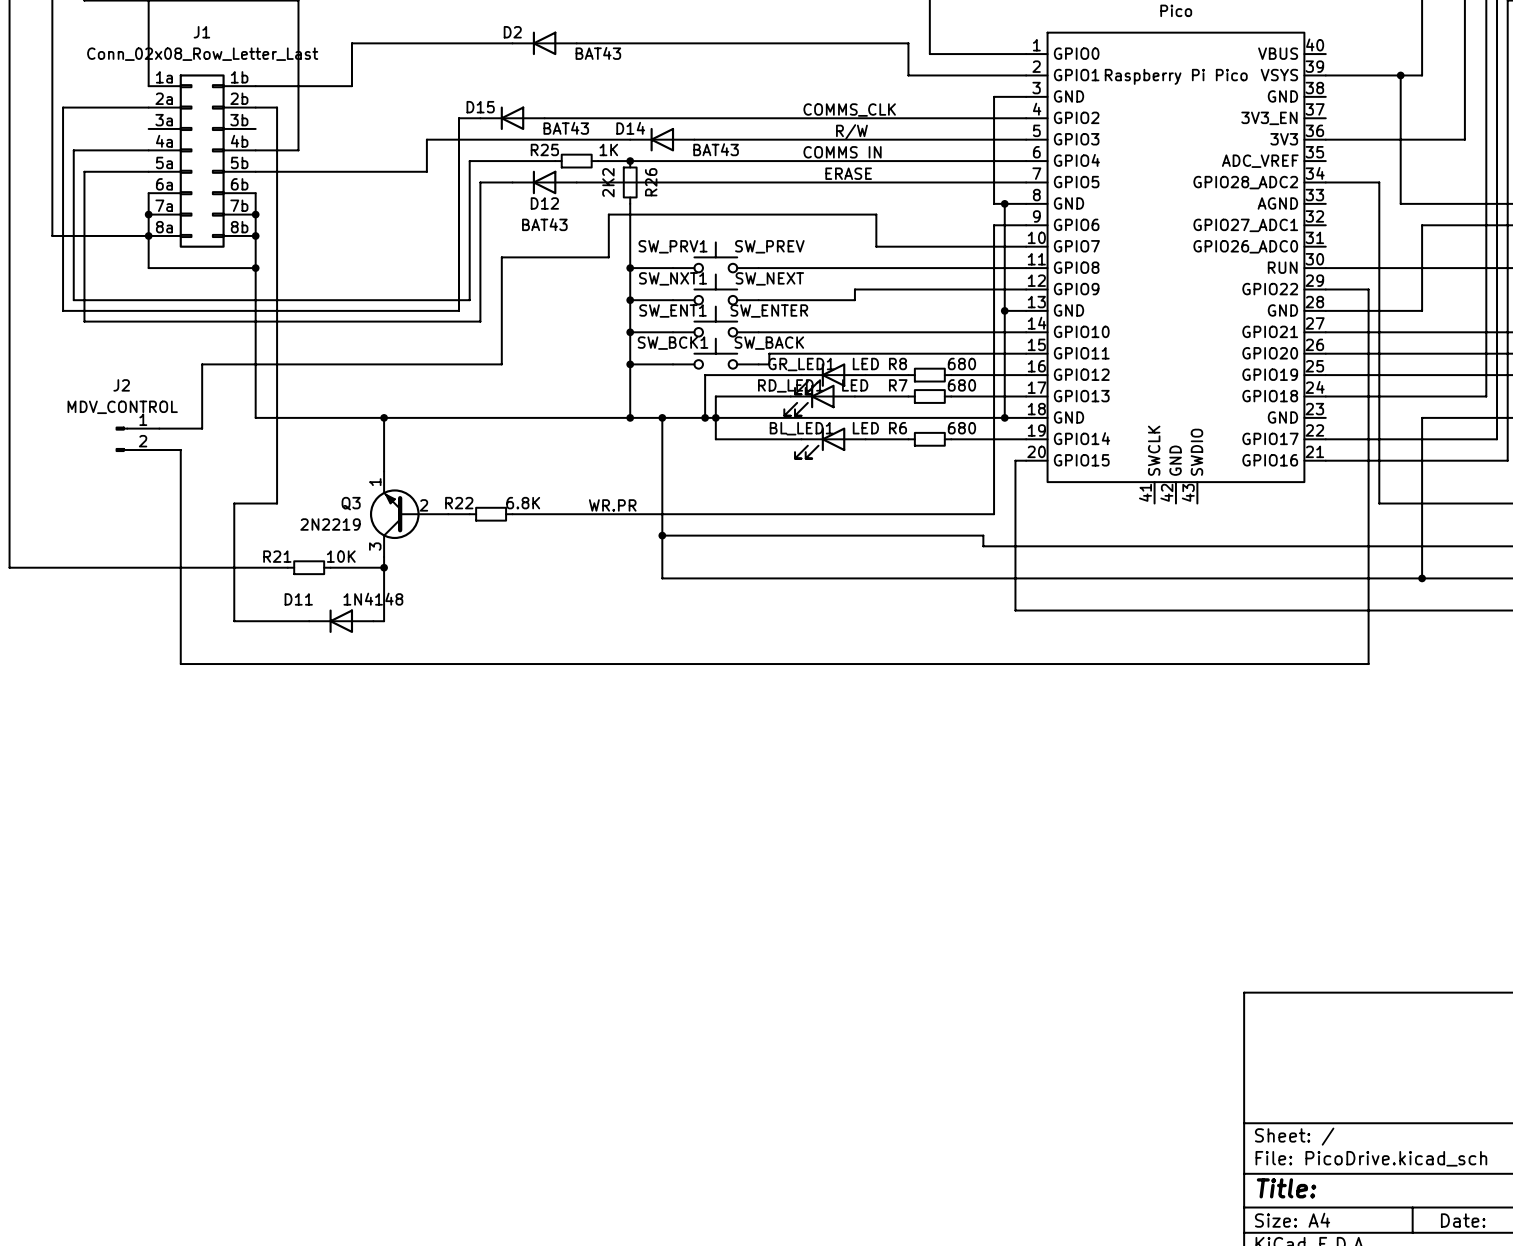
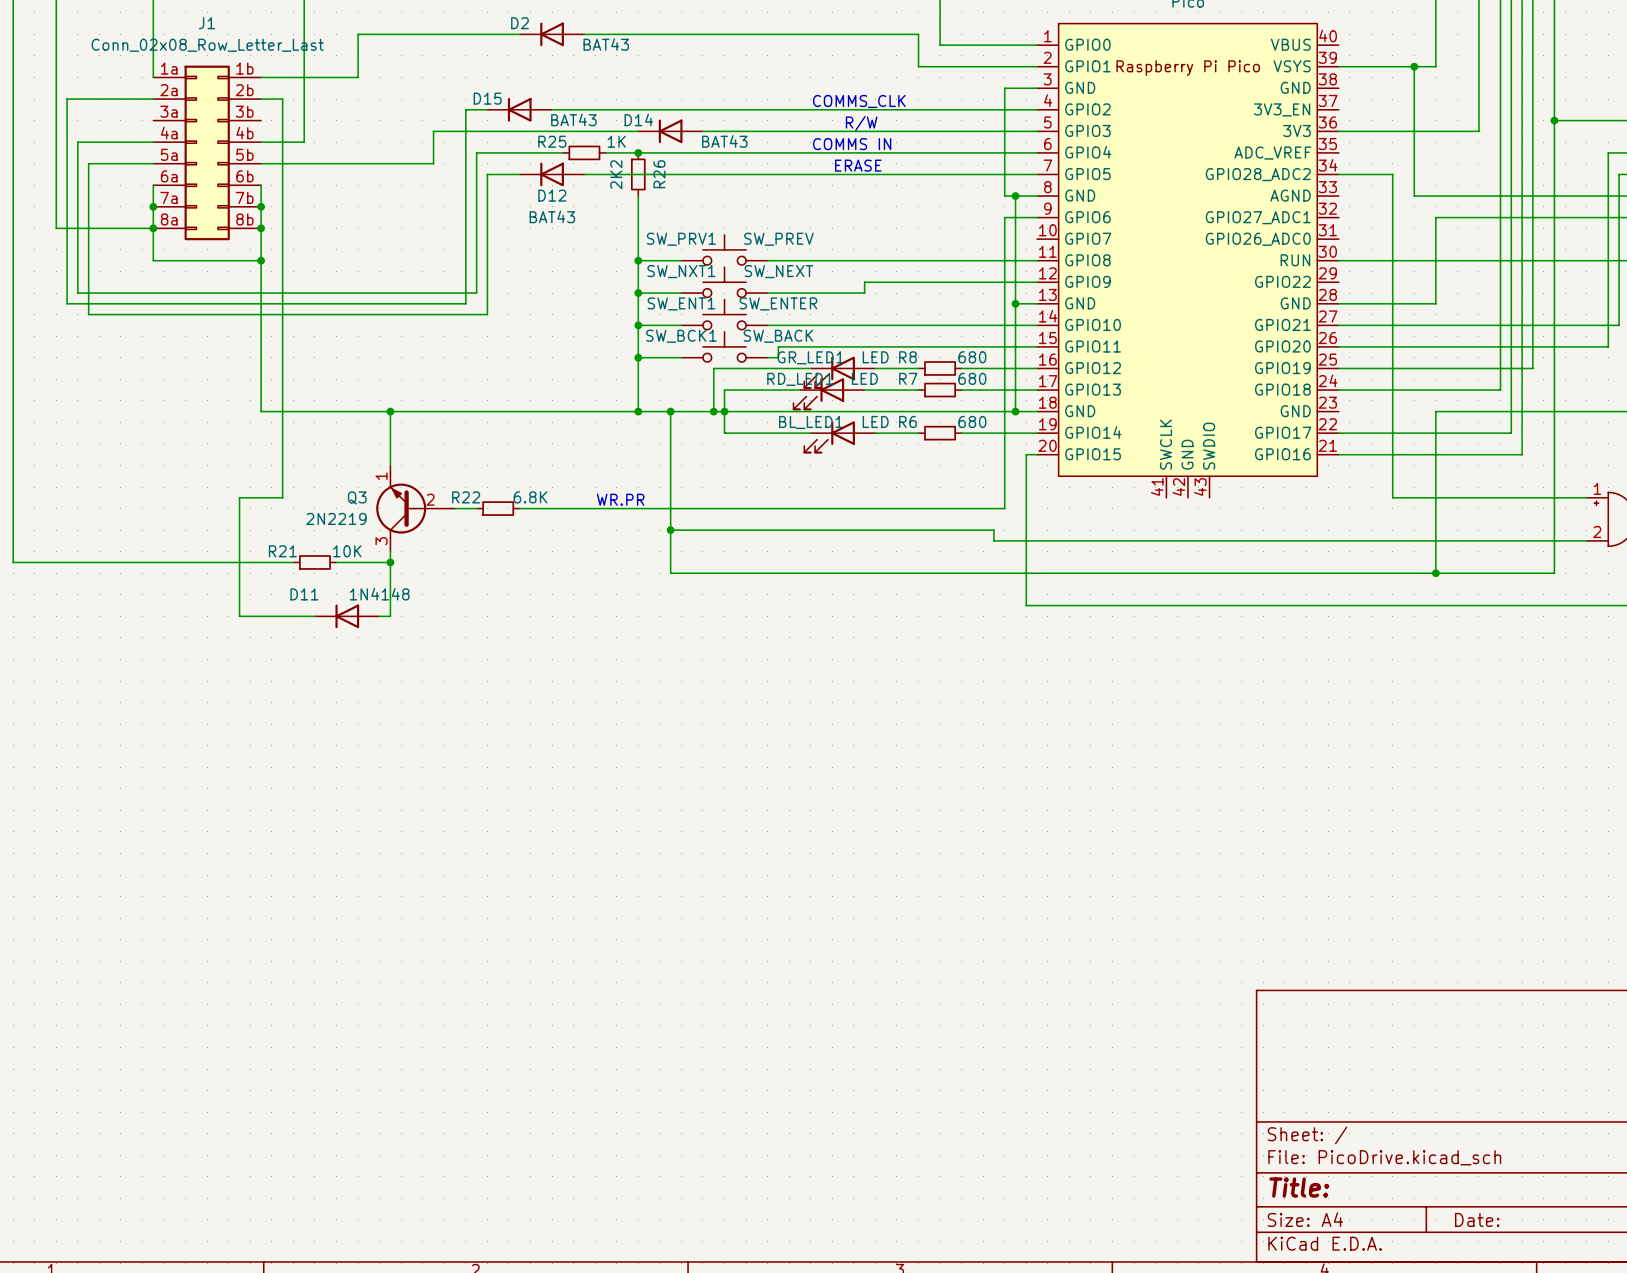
wire: (1026, 246) (876, 246) (876, 214) (608, 214) (608, 257) (501, 257) (501, 364) (202, 364) (202, 428) (159, 428) -> none
wire: (1325, 289) (1368, 289) (1368, 664) (180, 664) (180, 450) (159, 450) -> none
J2: MDV_CONTROL (137, 439) -> none

